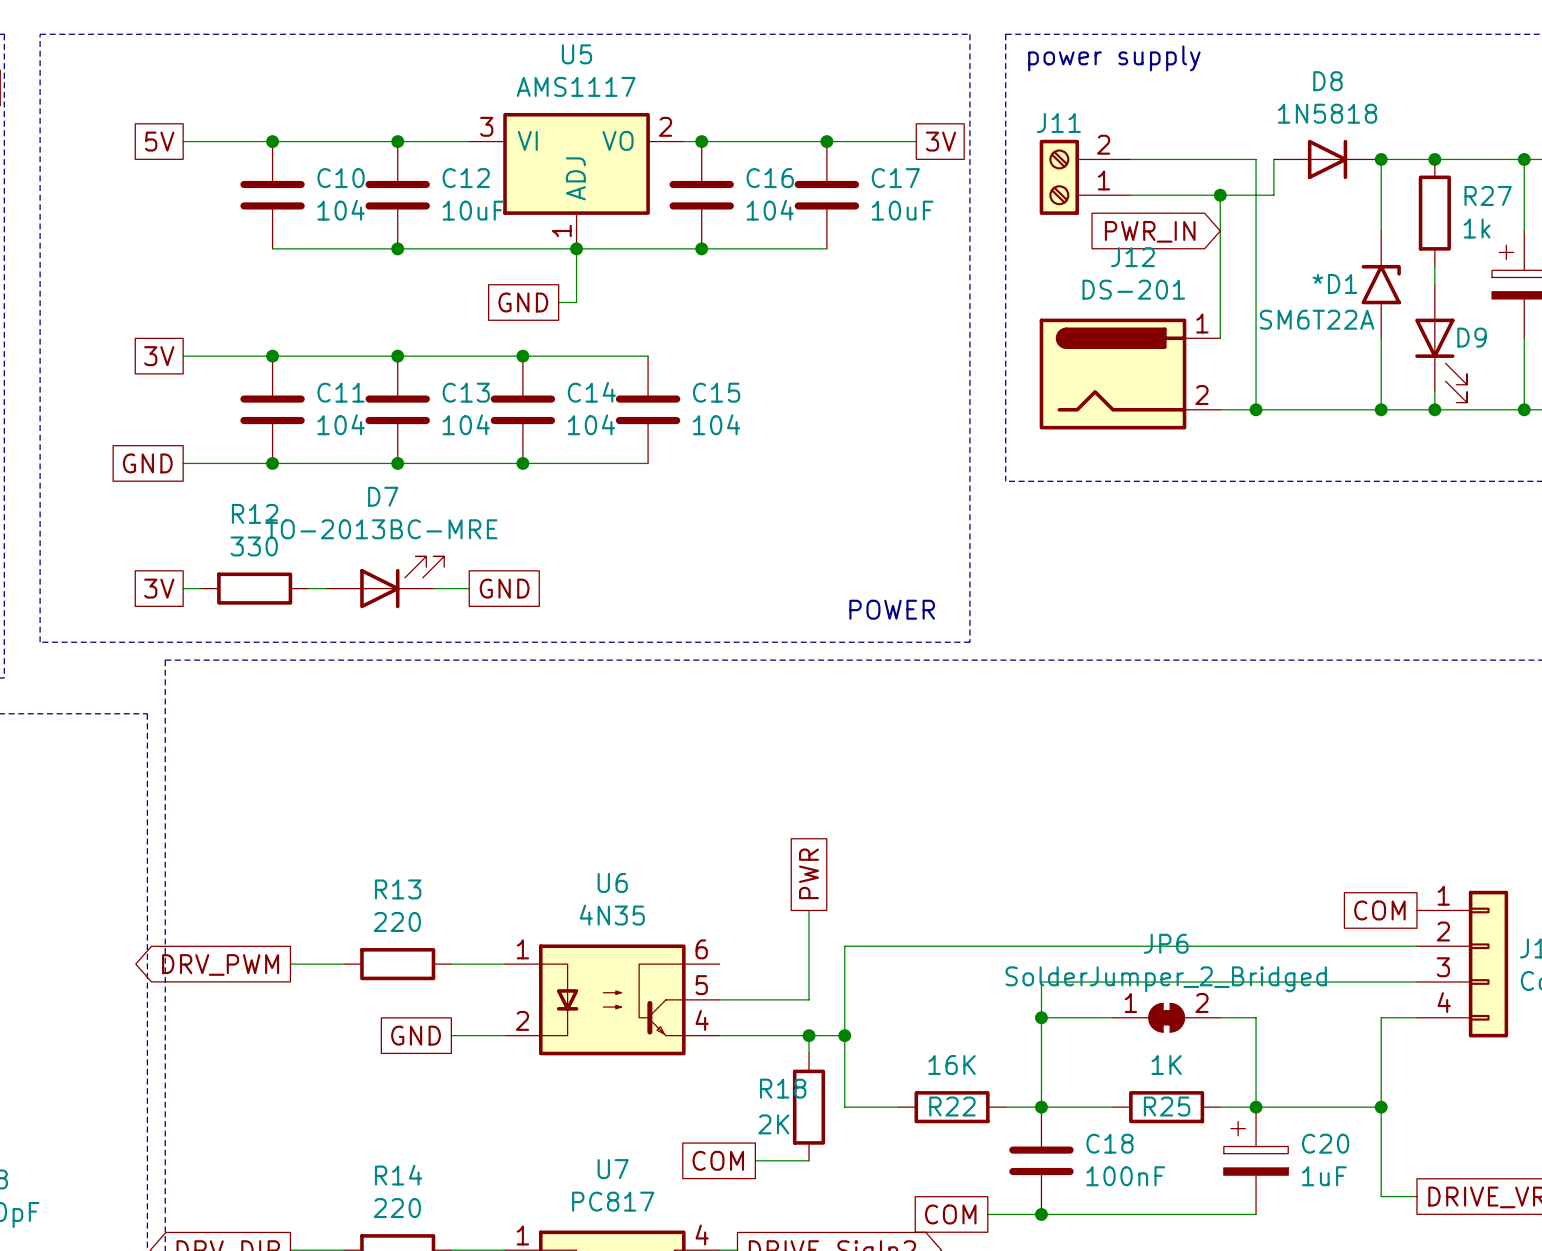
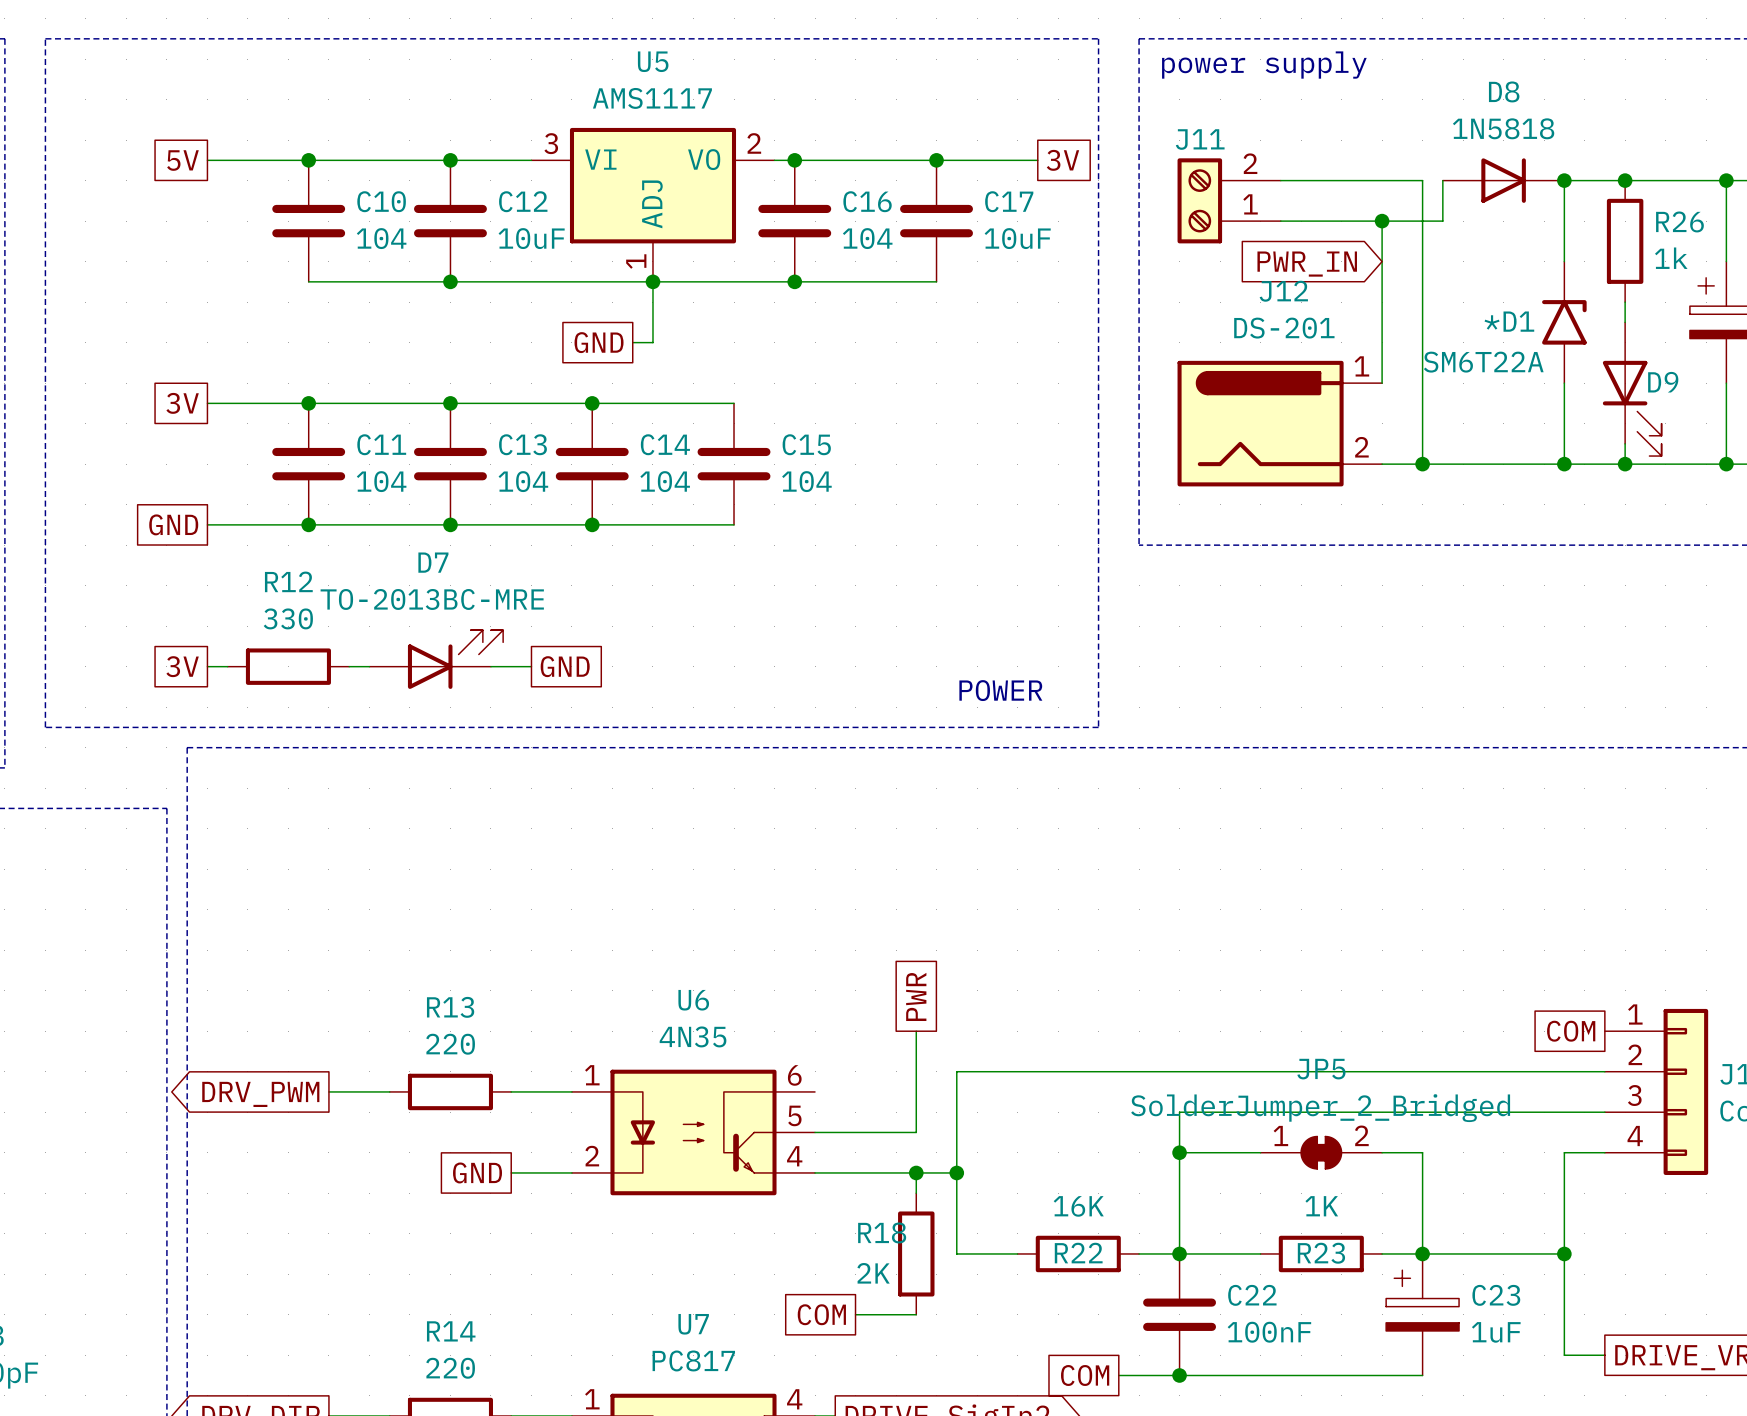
R27 name: R27 (1488, 195) -> R26 (1679, 221)
JP6 name: JP6 (1166, 943) -> JP5 (1321, 1069)
R25 name: R25 (1167, 1106) -> R23 (1321, 1253)
C18 name: C18 (1109, 1143) -> C22 (1252, 1295)
C20 name: C20 (1325, 1143) -> C23 (1496, 1295)

